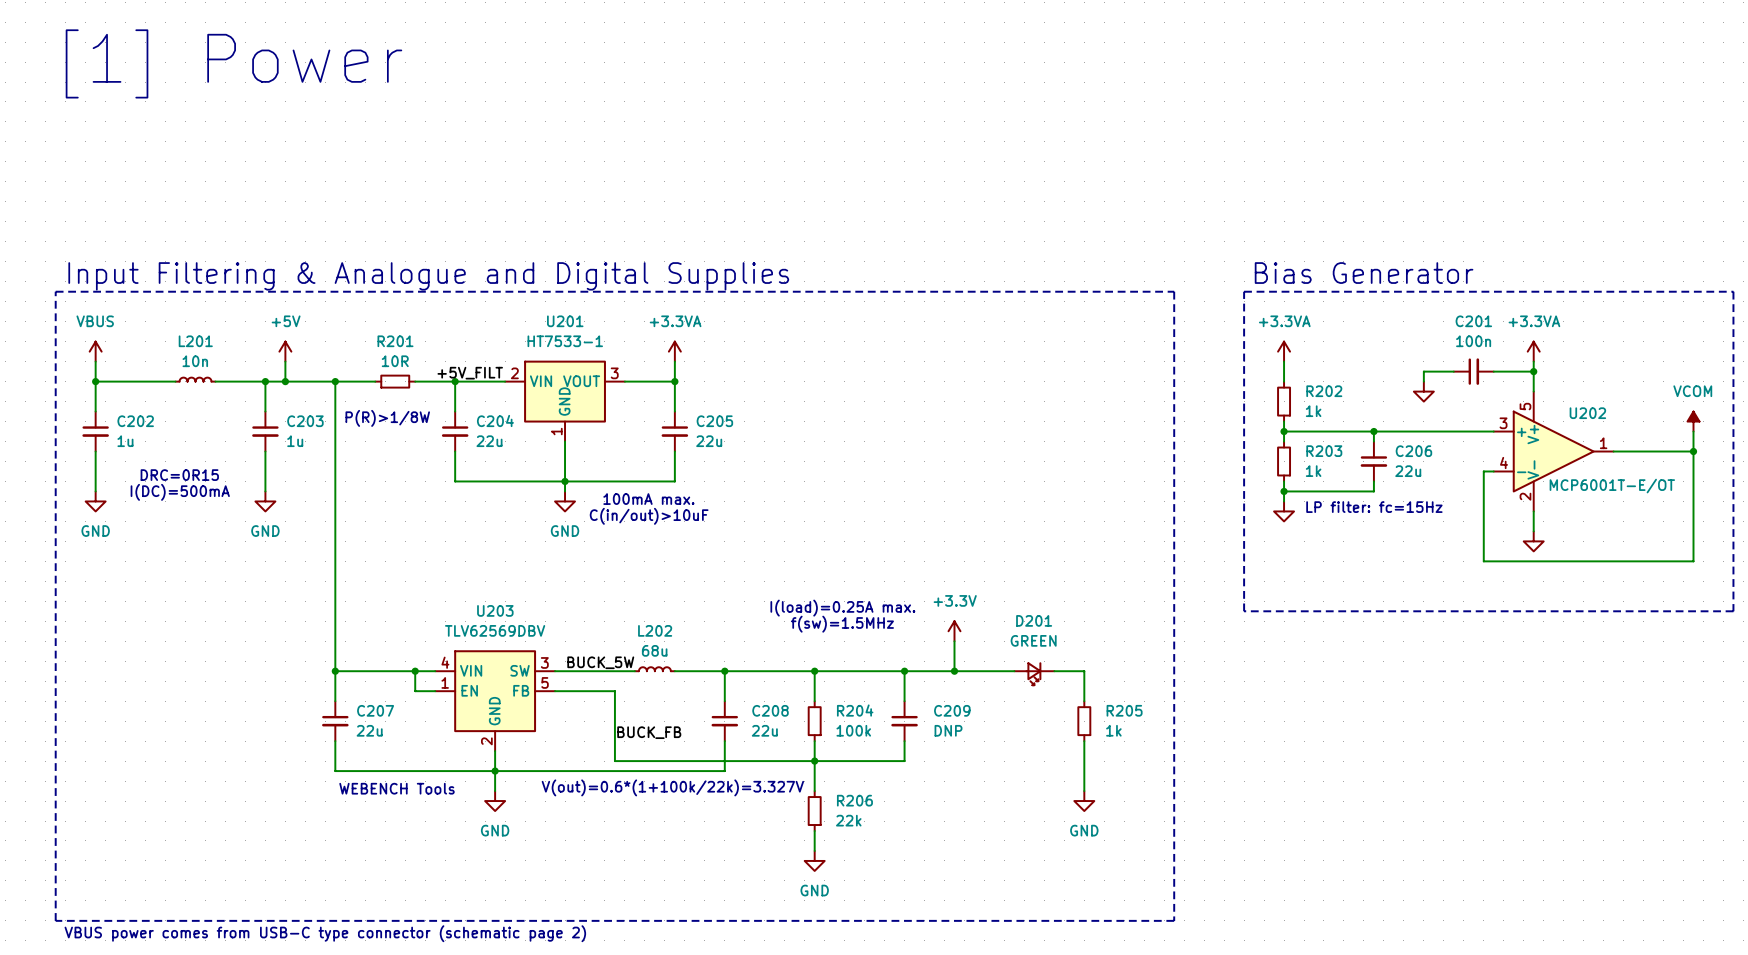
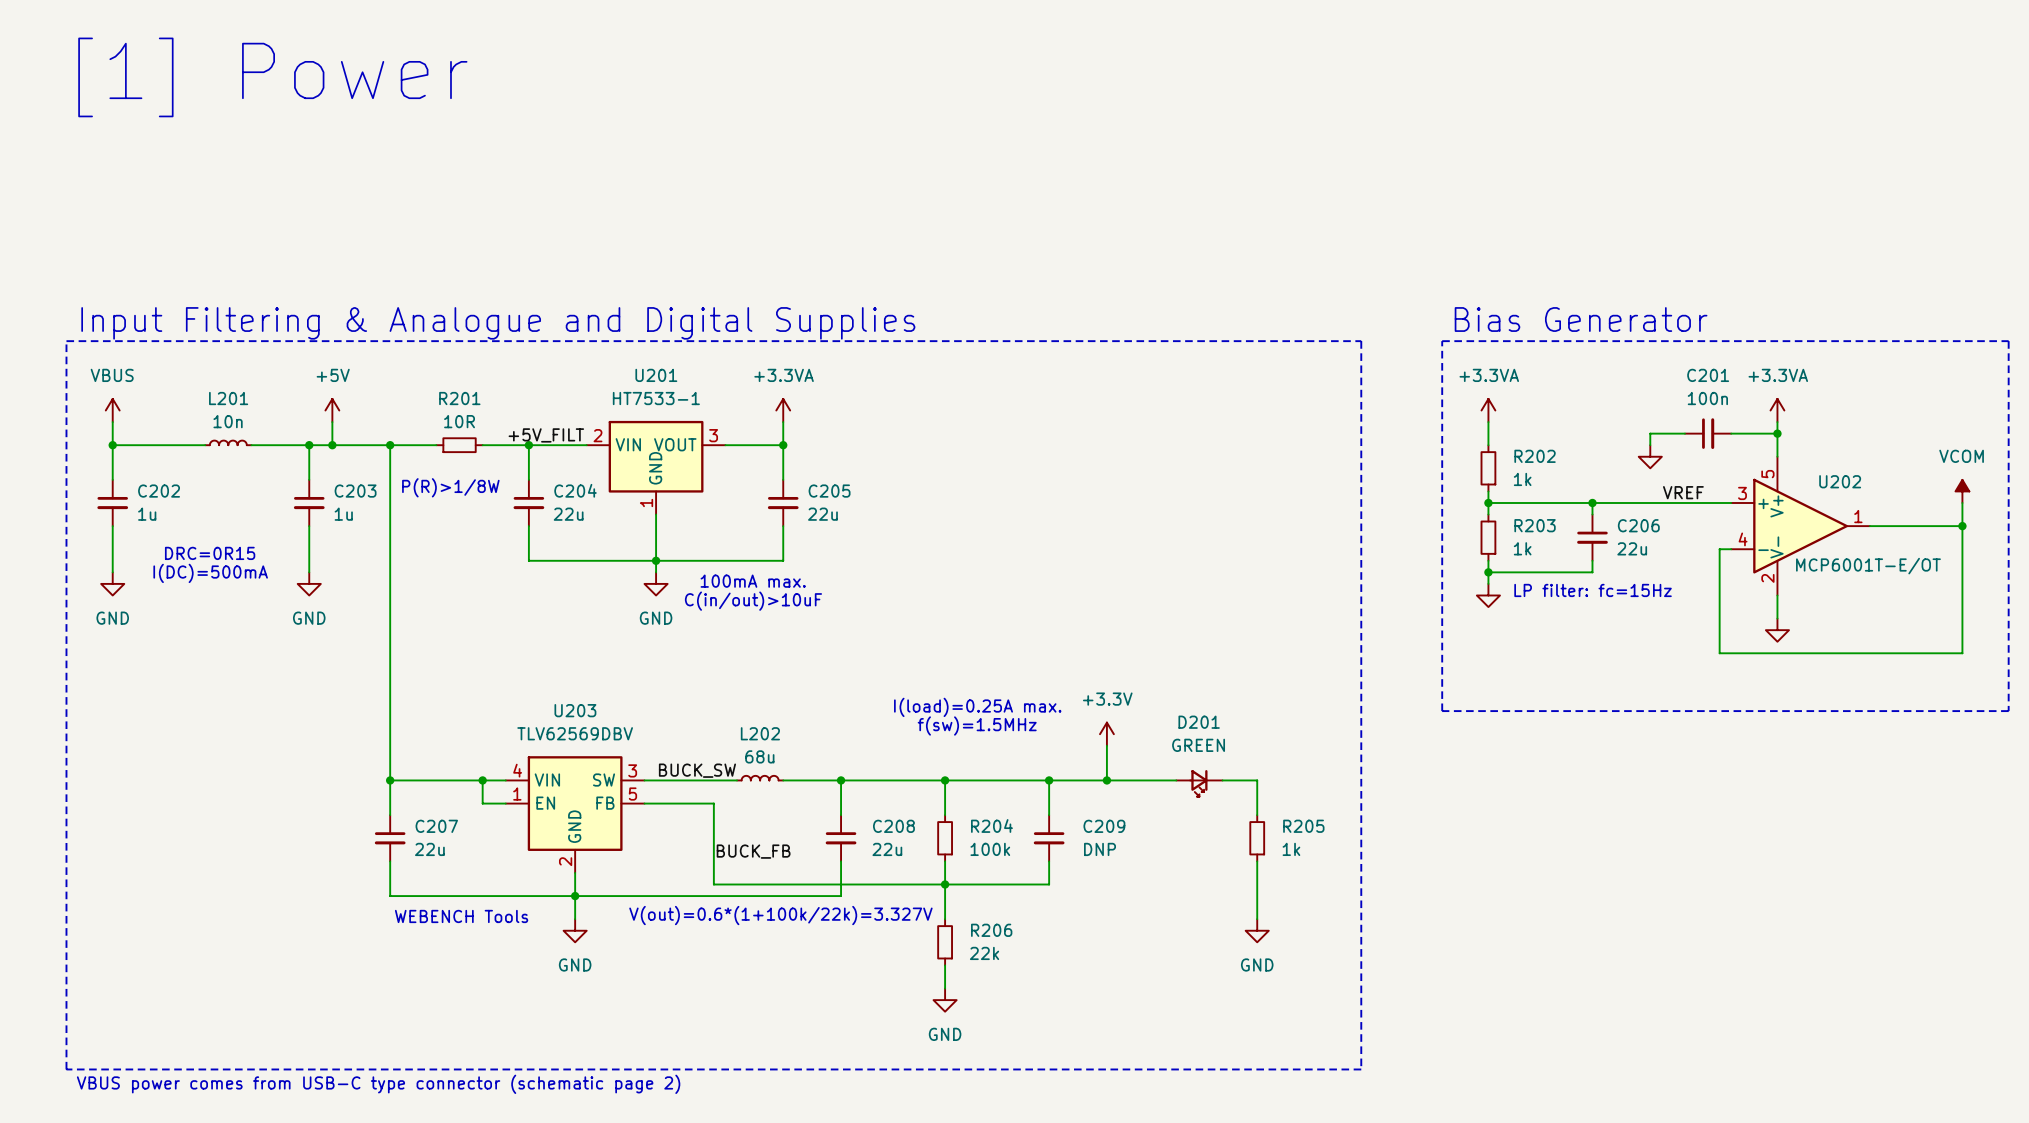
label: none -> VREF (1683, 492)
label: BUCK_5W (600, 662) -> BUCK_SW (697, 770)

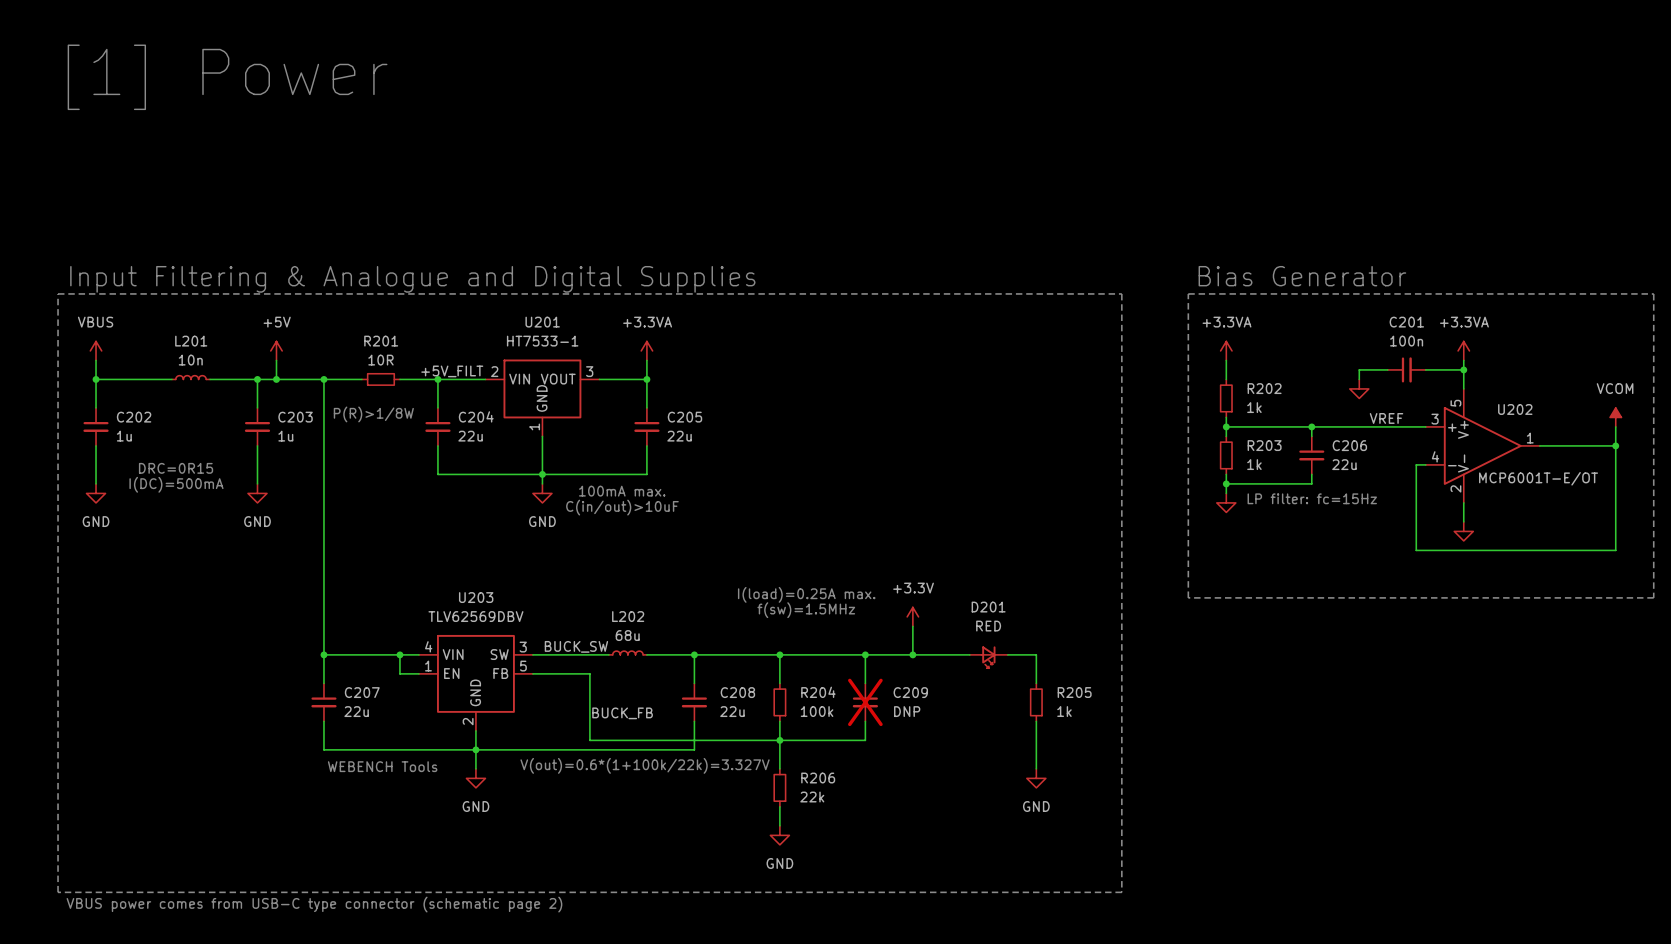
D201 value: GREEN (1198, 745) -> RED (988, 626)
C209 do-not-place cross: none -> (865, 702)

